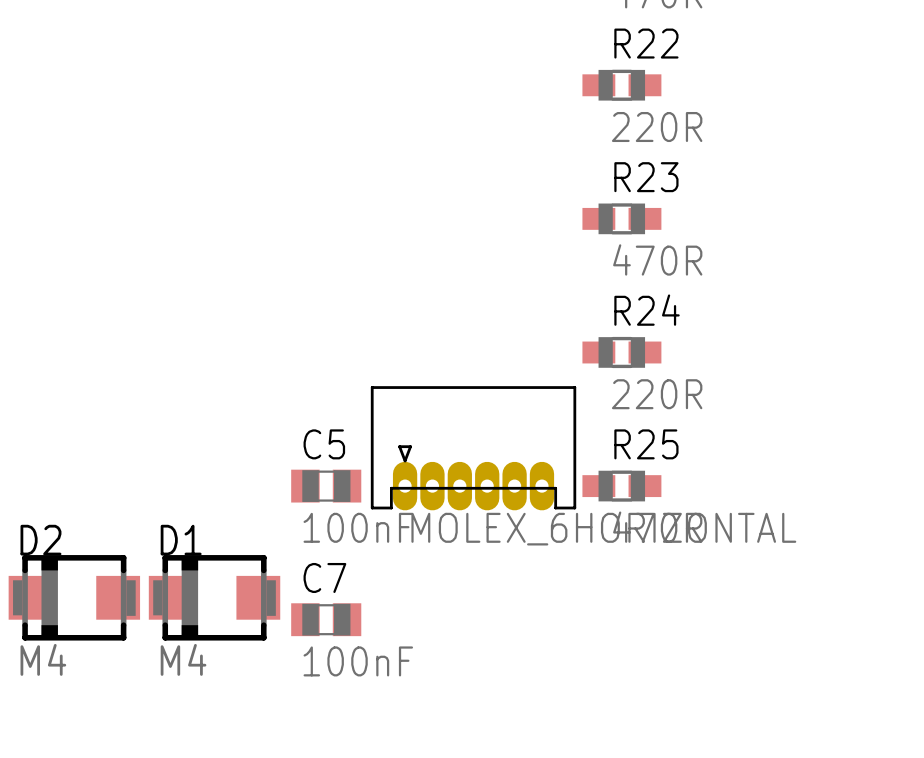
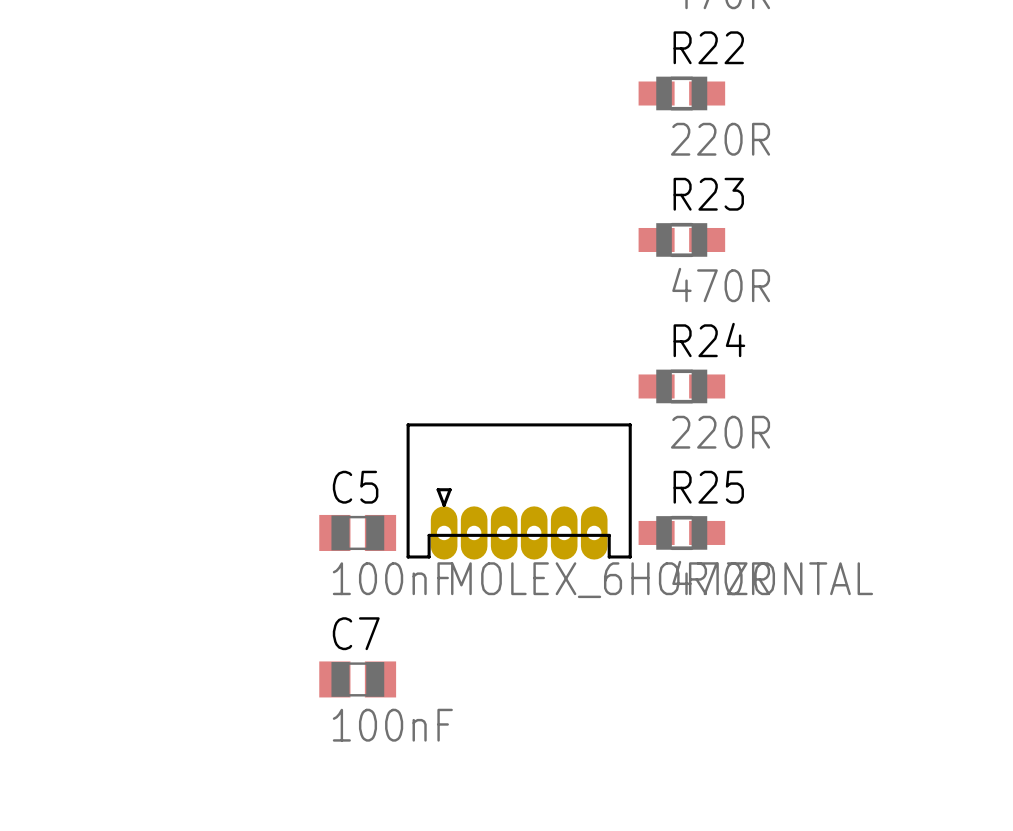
D2: M4 (74, 597) -> none
D1: M4 (214, 597) -> none

